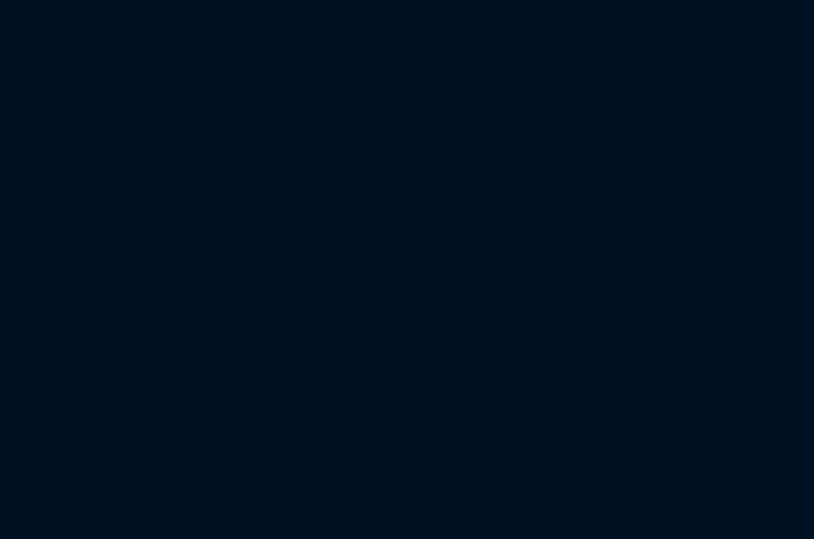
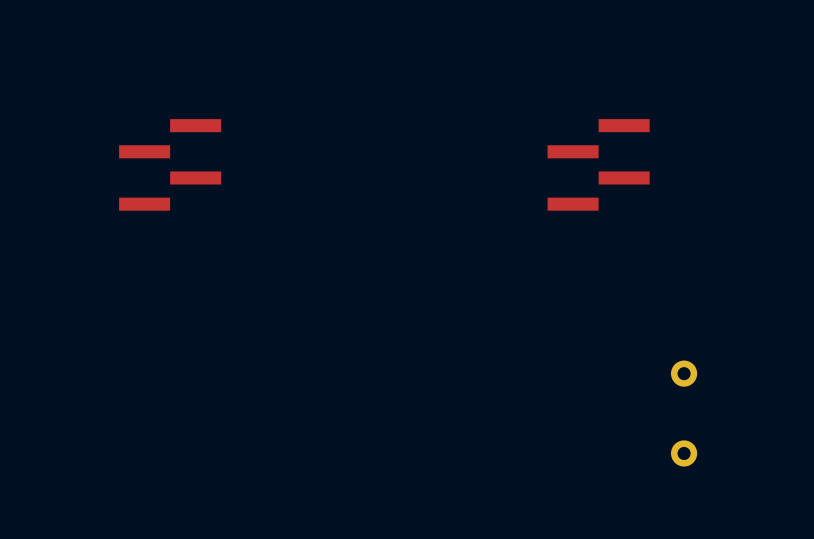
part: none -> (170, 164)
part: none -> (598, 164)
part: none -> (684, 373)
part: none -> (684, 453)

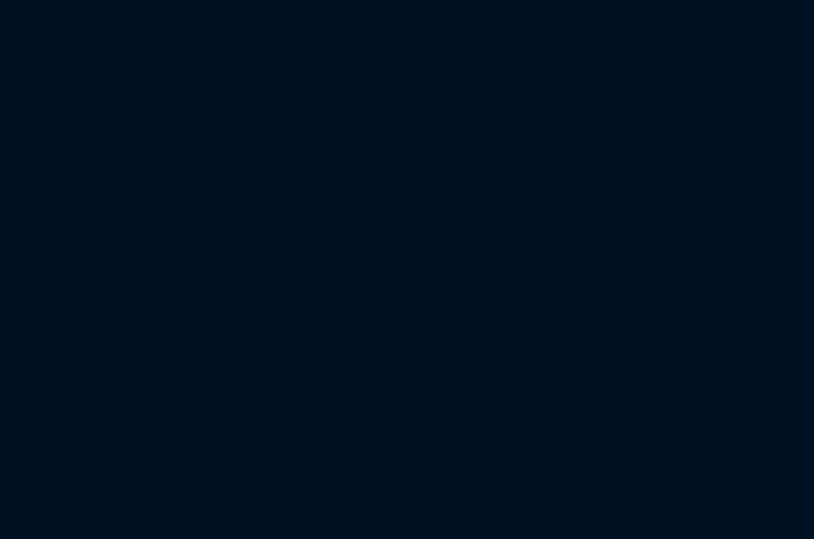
part: (170, 164) -> none
part: (598, 164) -> none
part: (684, 373) -> none
part: (684, 453) -> none

